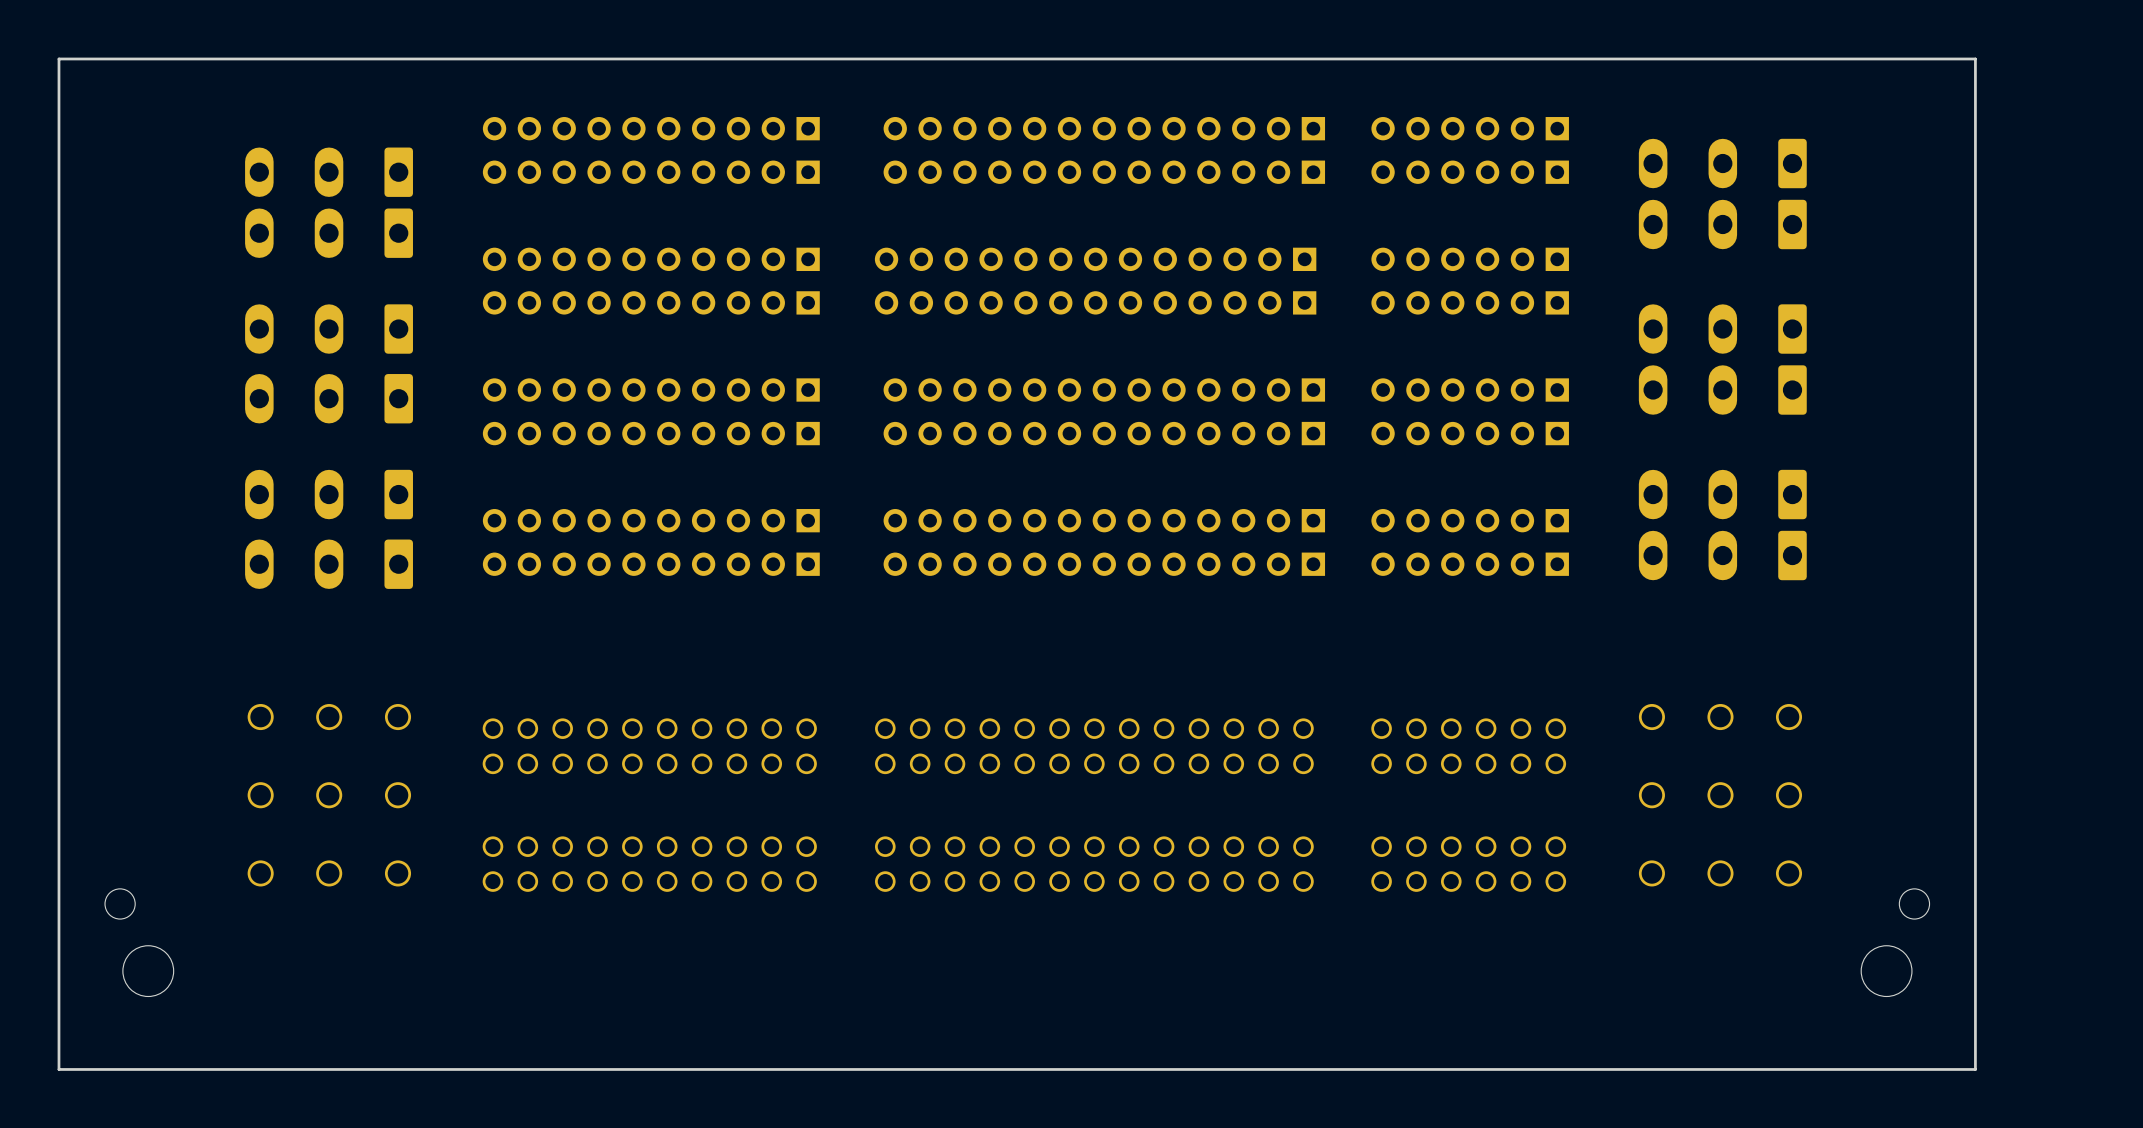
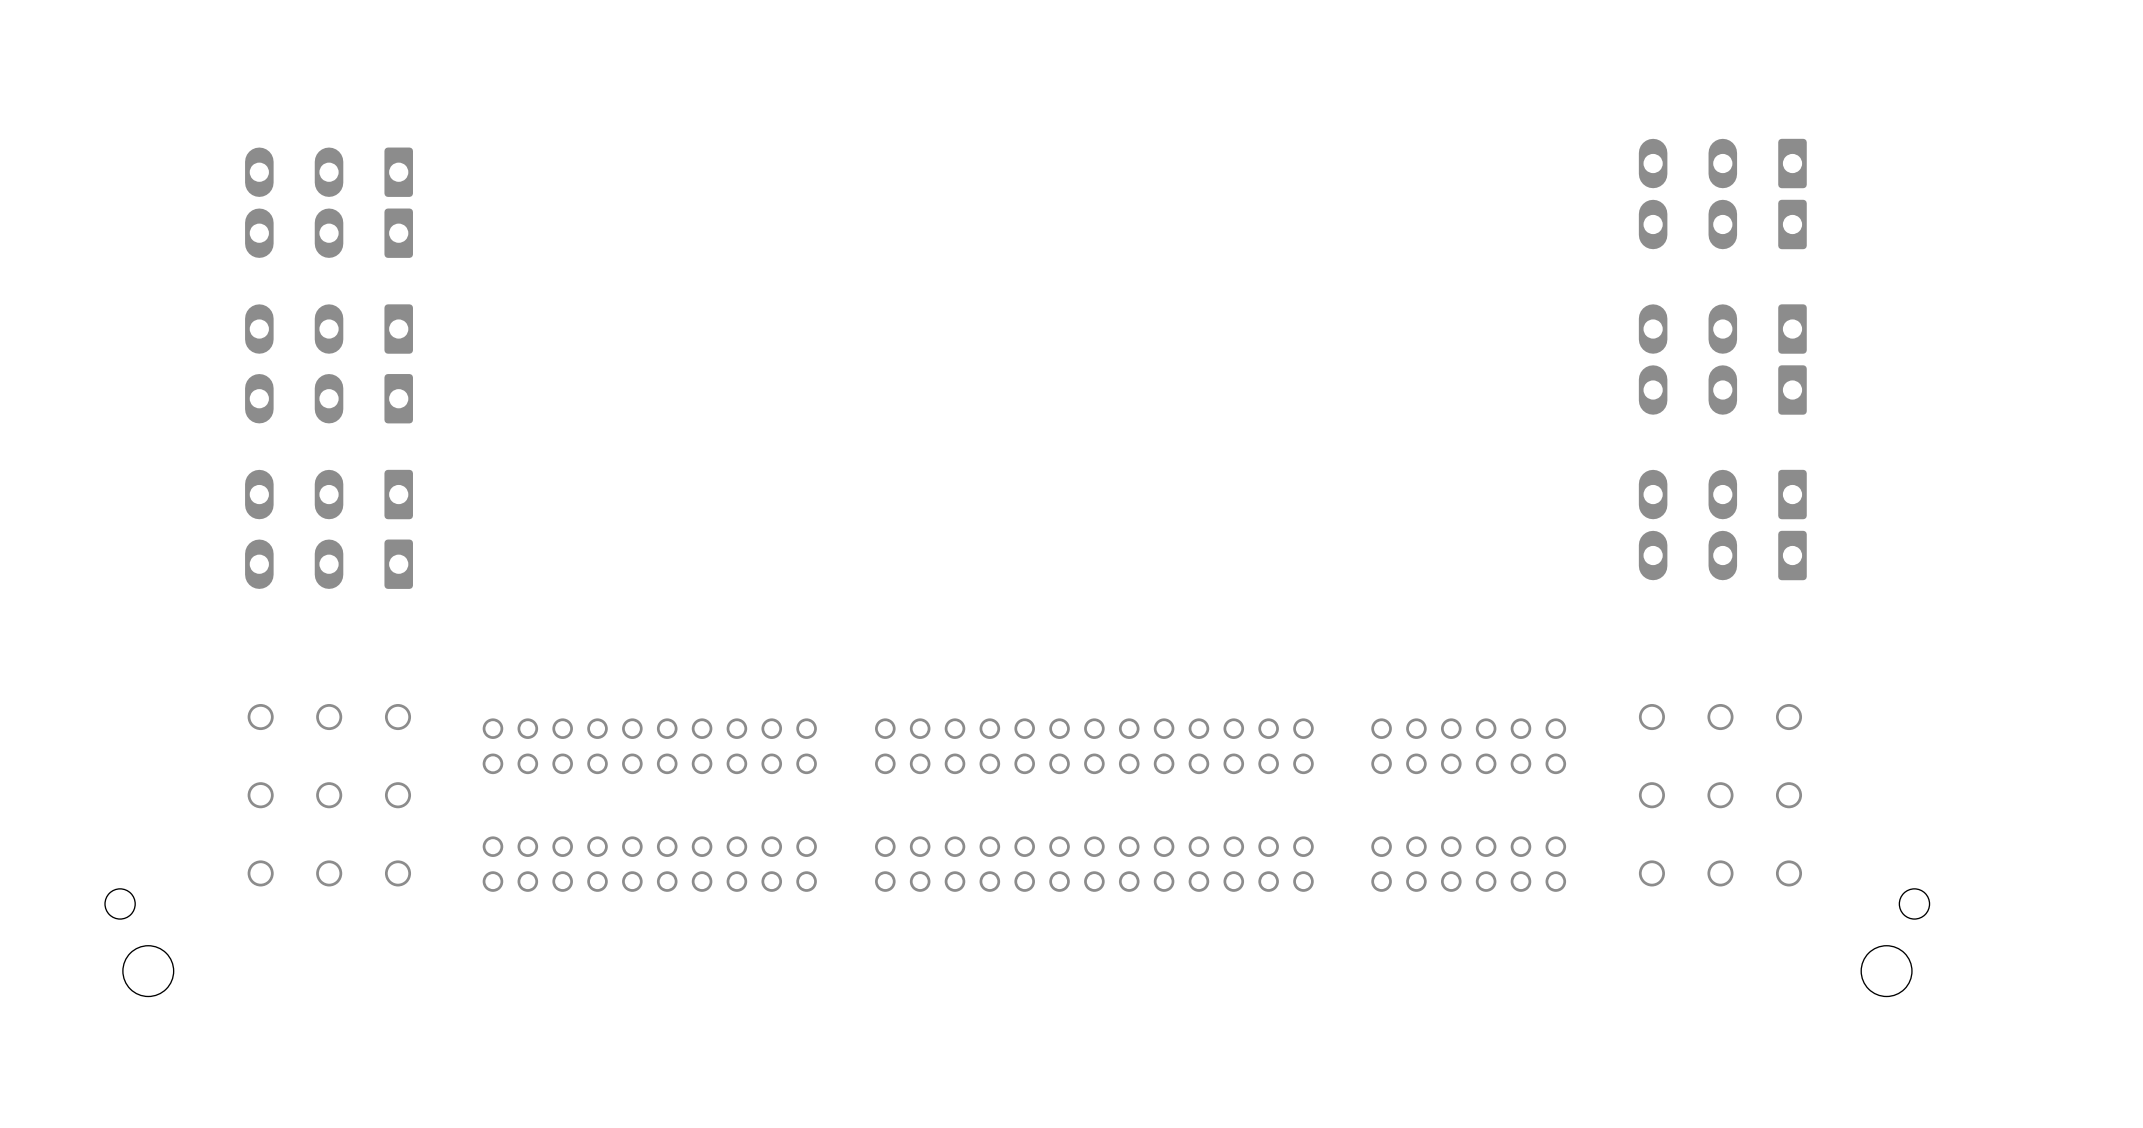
board edge: (1975, 58) (1975, 1069) (58, 1069) (58, 58) (1975, 58) -> none
part: (651, 128) -> none
part: (1104, 128) -> none
part: (1470, 128) -> none
part: (651, 172) -> none
part: (1104, 172) -> none
part: (1470, 172) -> none
part: (651, 259) -> none
part: (1095, 259) -> none
part: (1470, 259) -> none
part: (651, 302) -> none
part: (1095, 302) -> none
part: (1470, 302) -> none
part: (651, 390) -> none
part: (1104, 390) -> none
part: (1470, 390) -> none
part: (651, 433) -> none
part: (1104, 433) -> none
part: (1470, 433) -> none
part: (651, 520) -> none
part: (1104, 520) -> none
part: (1470, 520) -> none
part: (651, 564) -> none
part: (1104, 564) -> none
part: (1470, 564) -> none

